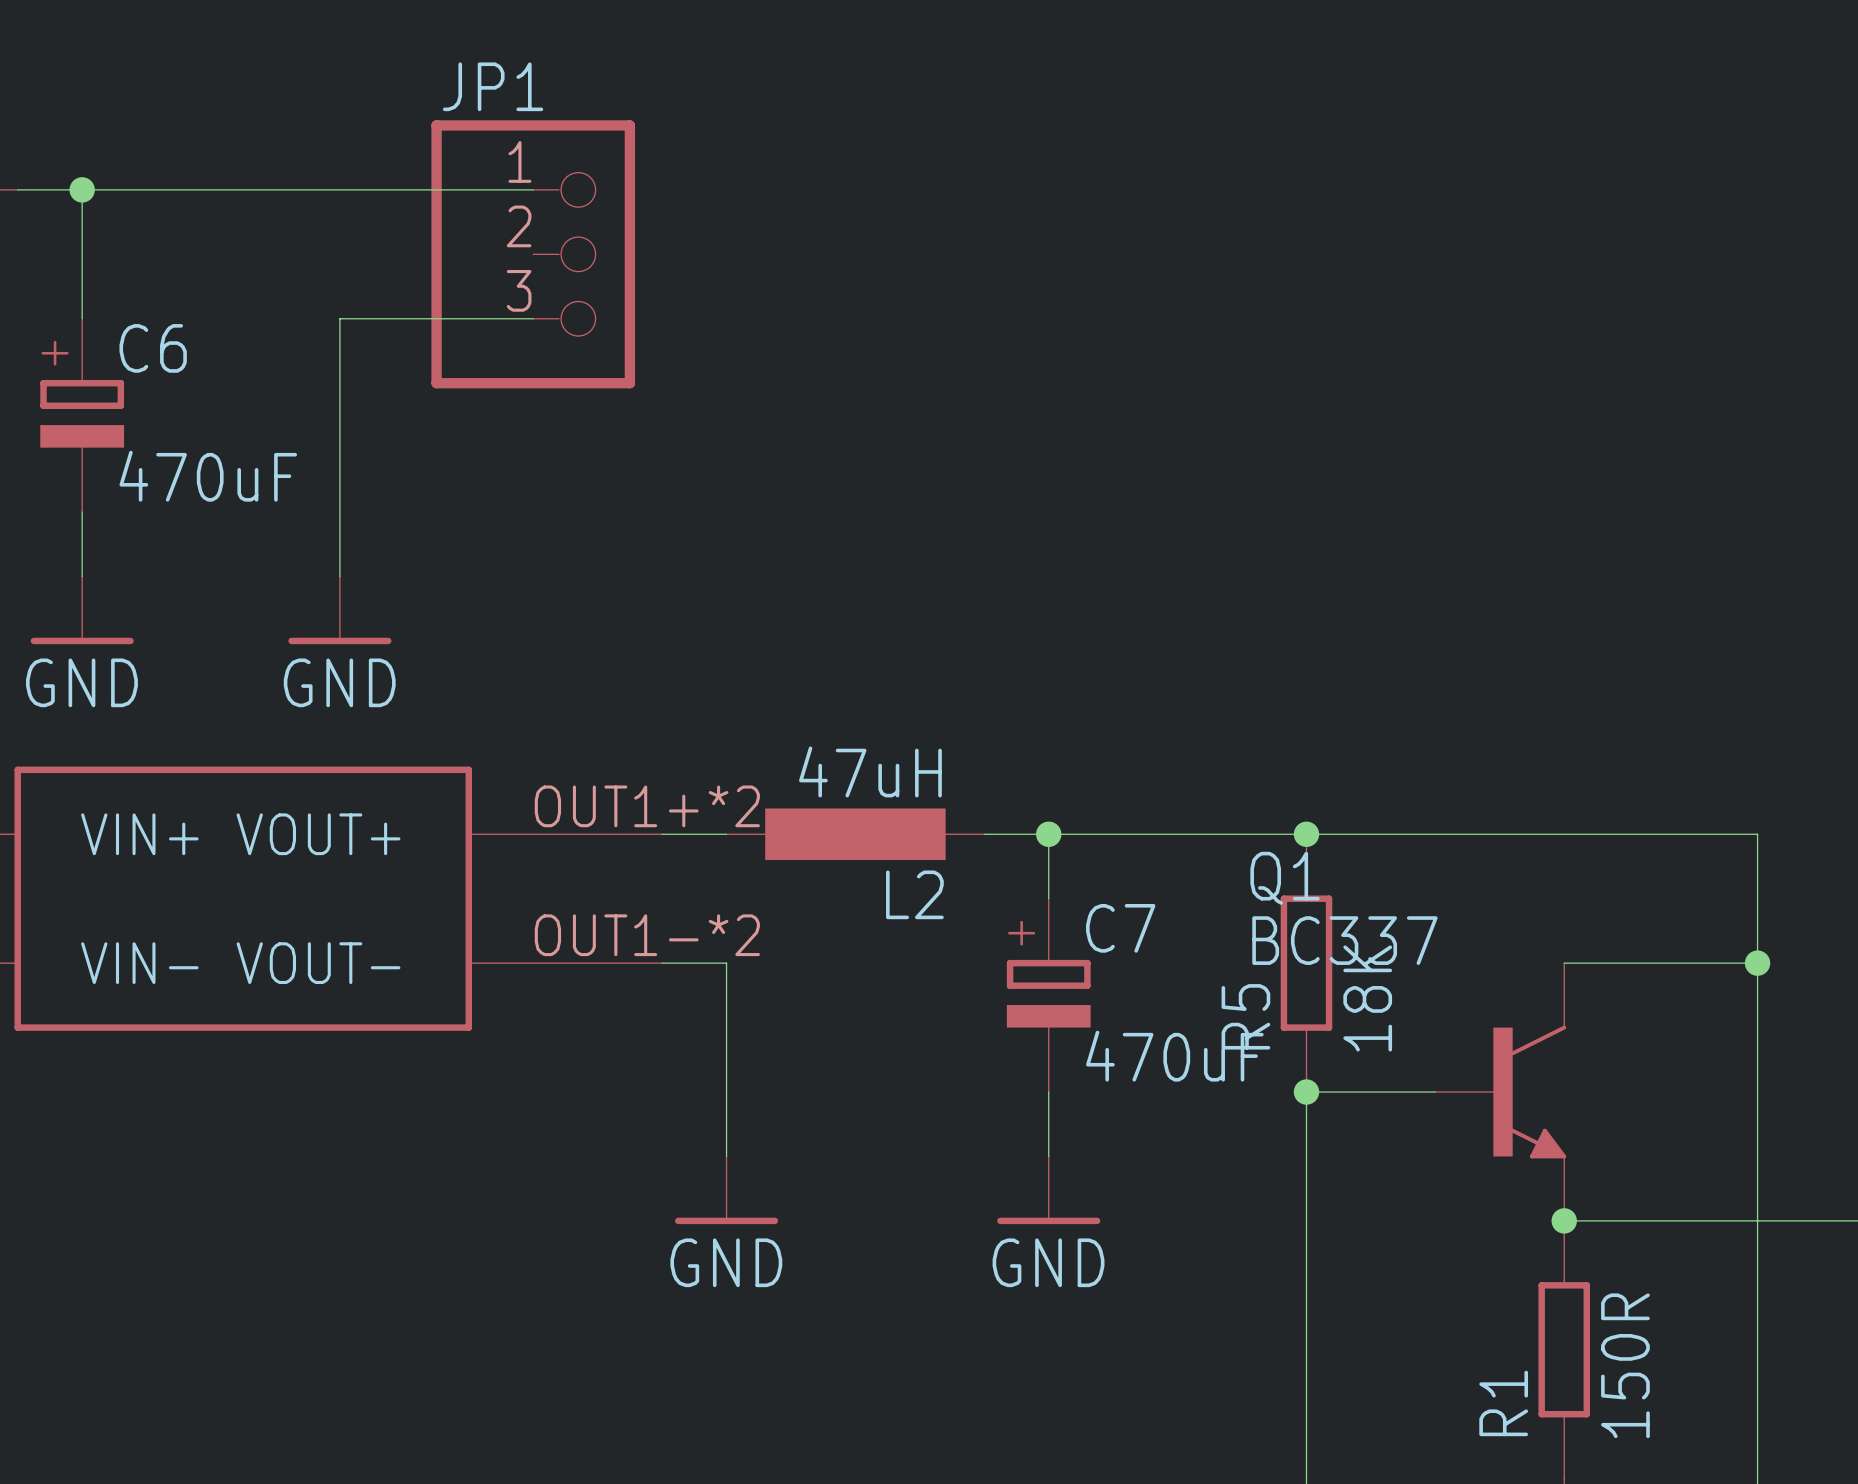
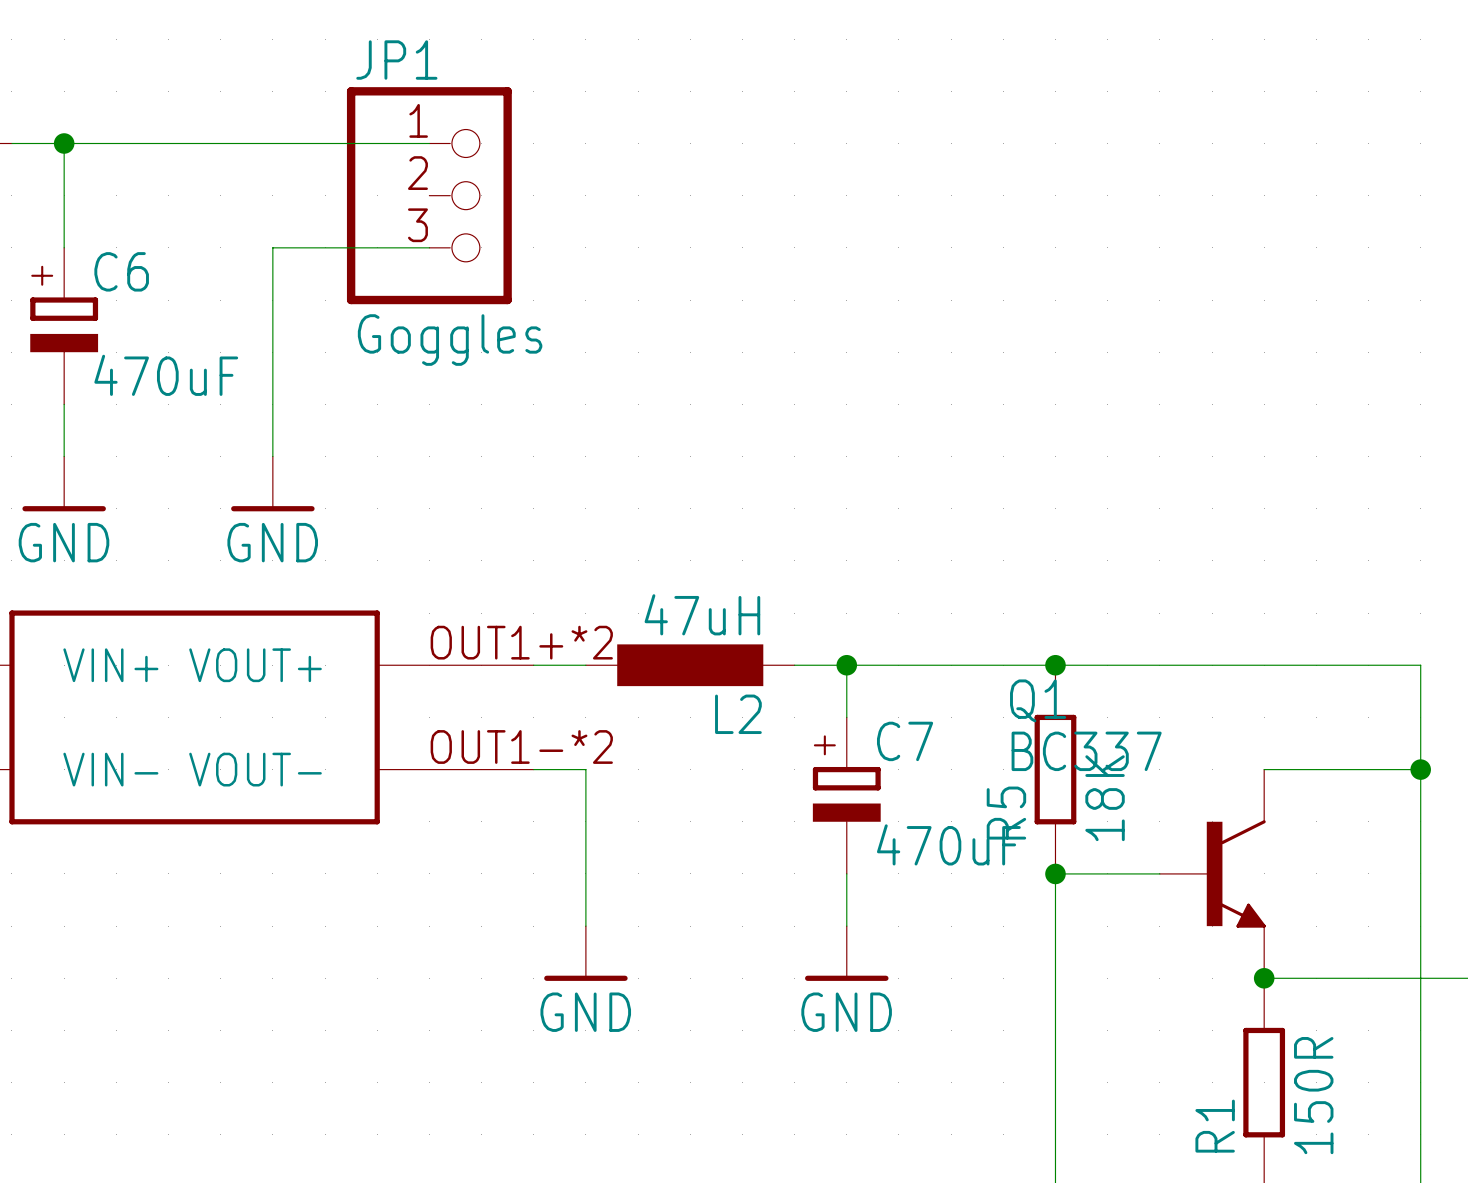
JP1 value: none -> Goggles (450, 340)

